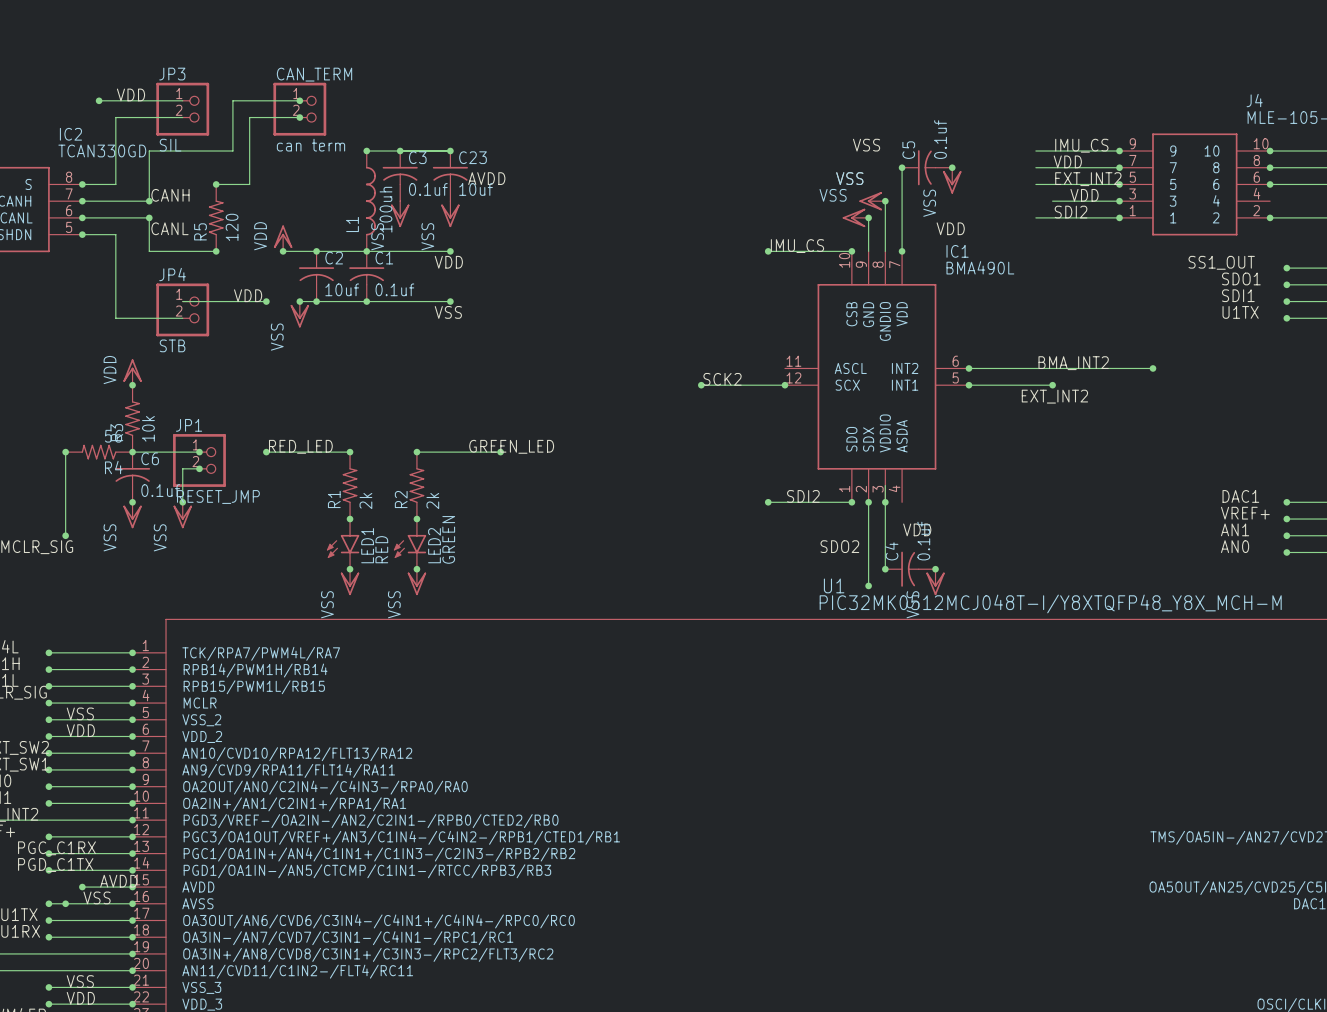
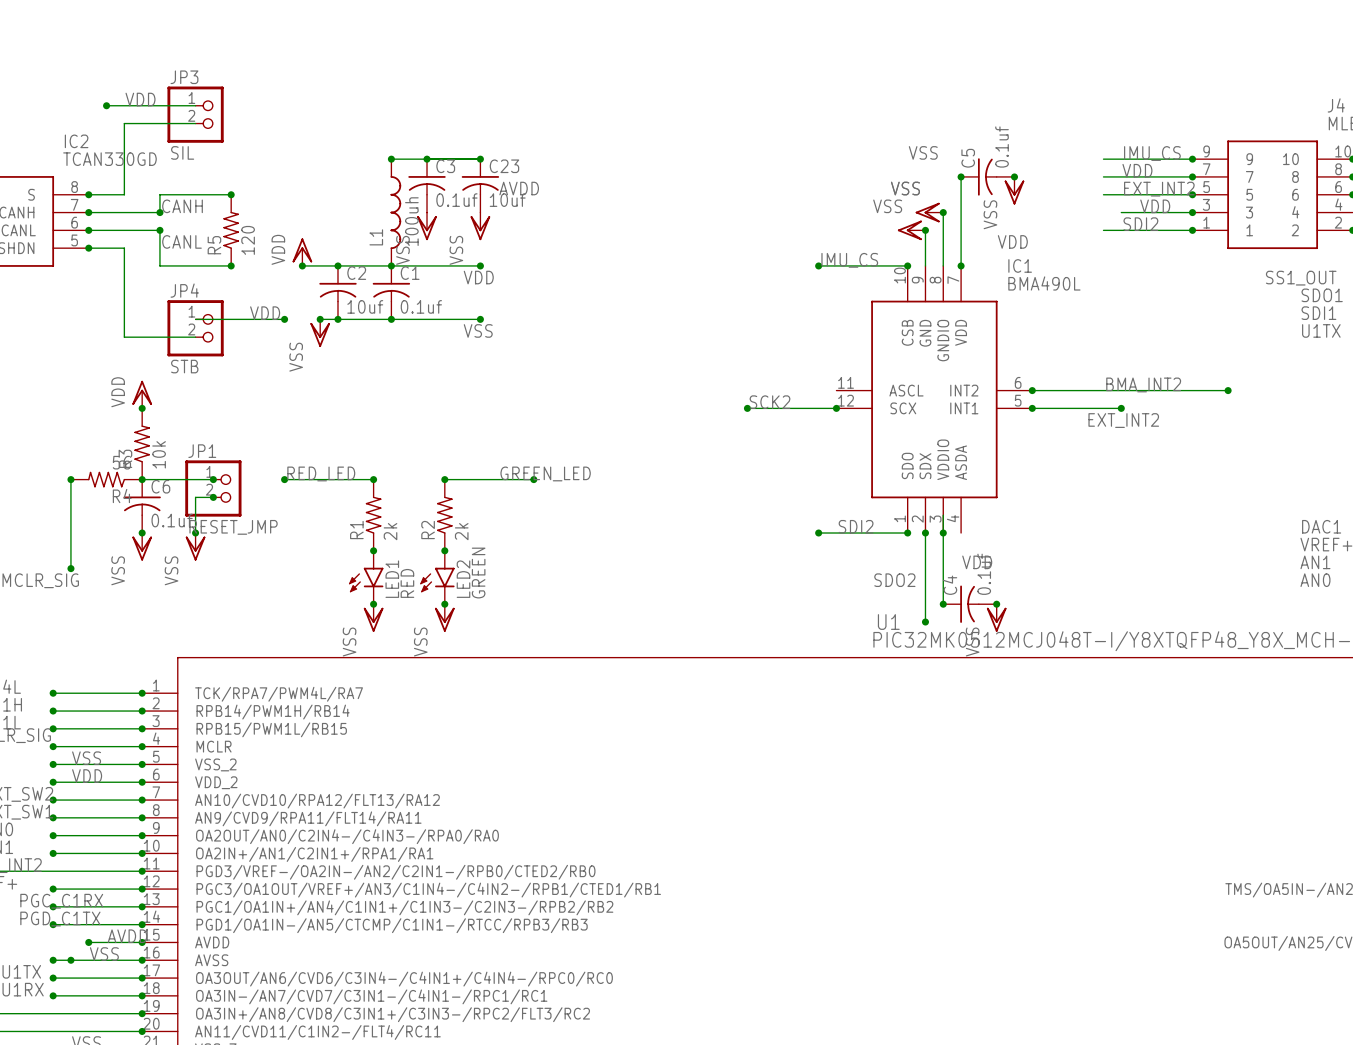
wire: (299, 100) (232, 100) (232, 151) (149, 151) (149, 184) -> (231, 194) (159, 194)
junction: (299, 100) -> none
CAN_TERM: can term (299, 109) -> none
wire: (299, 117) (249, 117) (249, 184) (216, 184) -> none
junction: (299, 117) -> none

